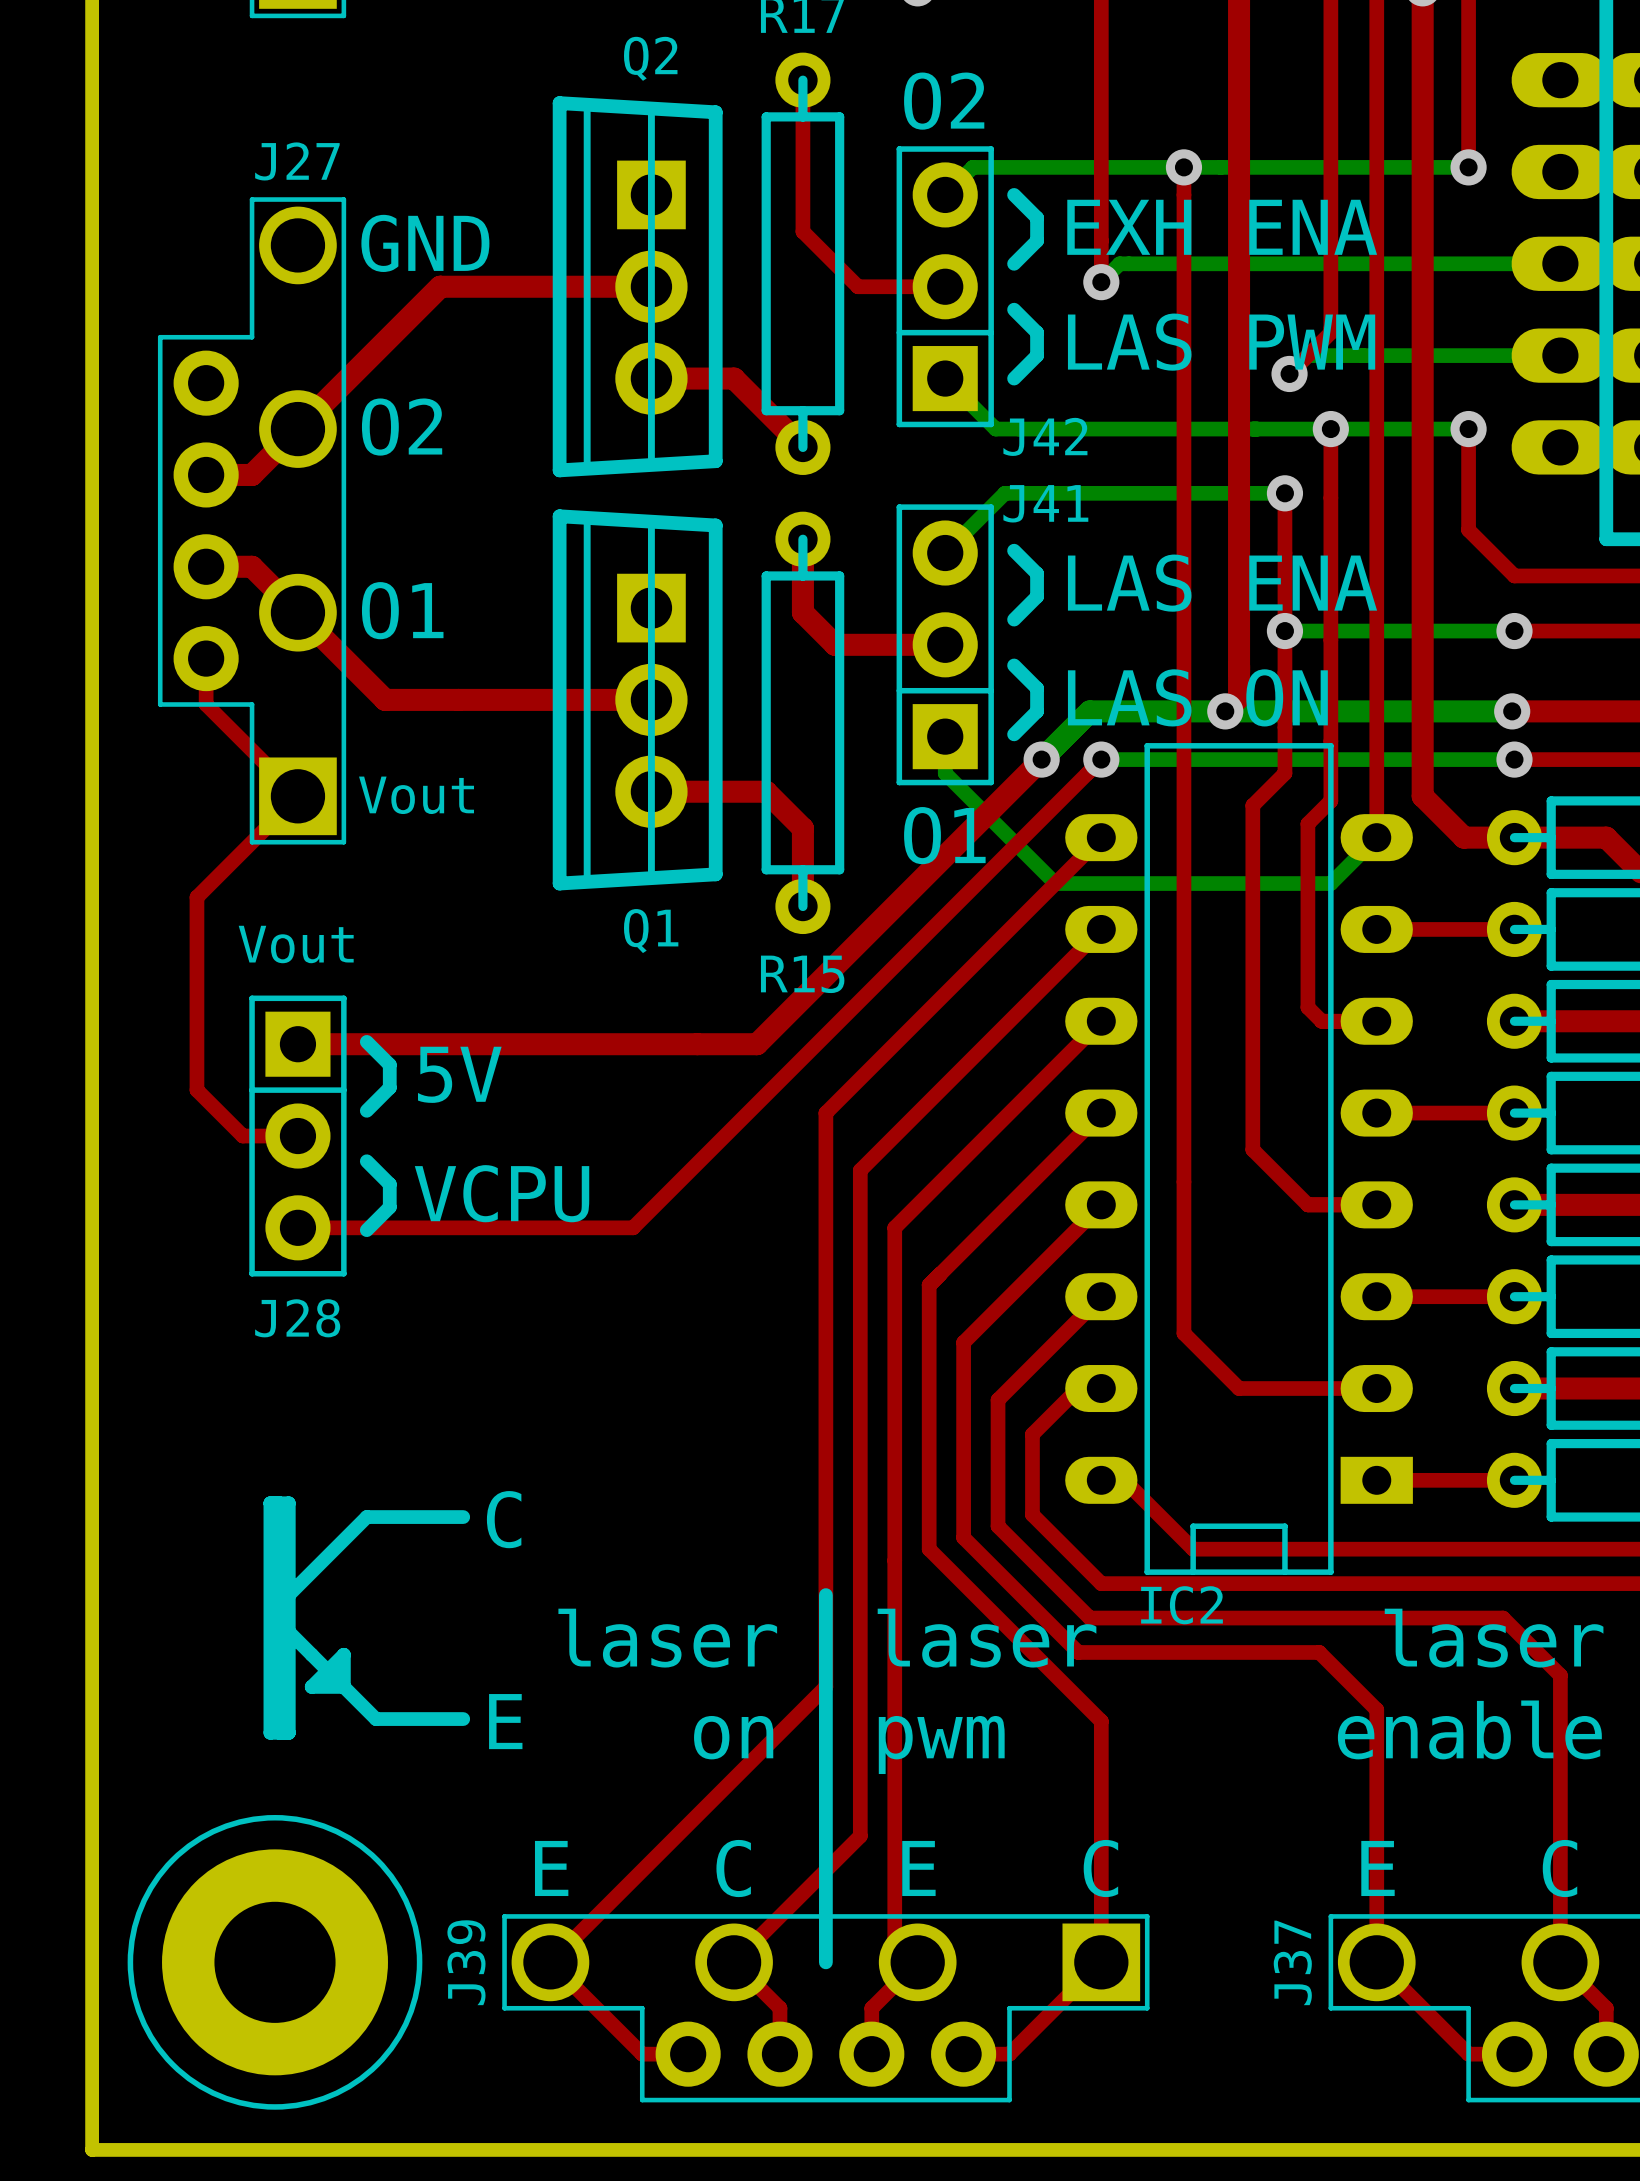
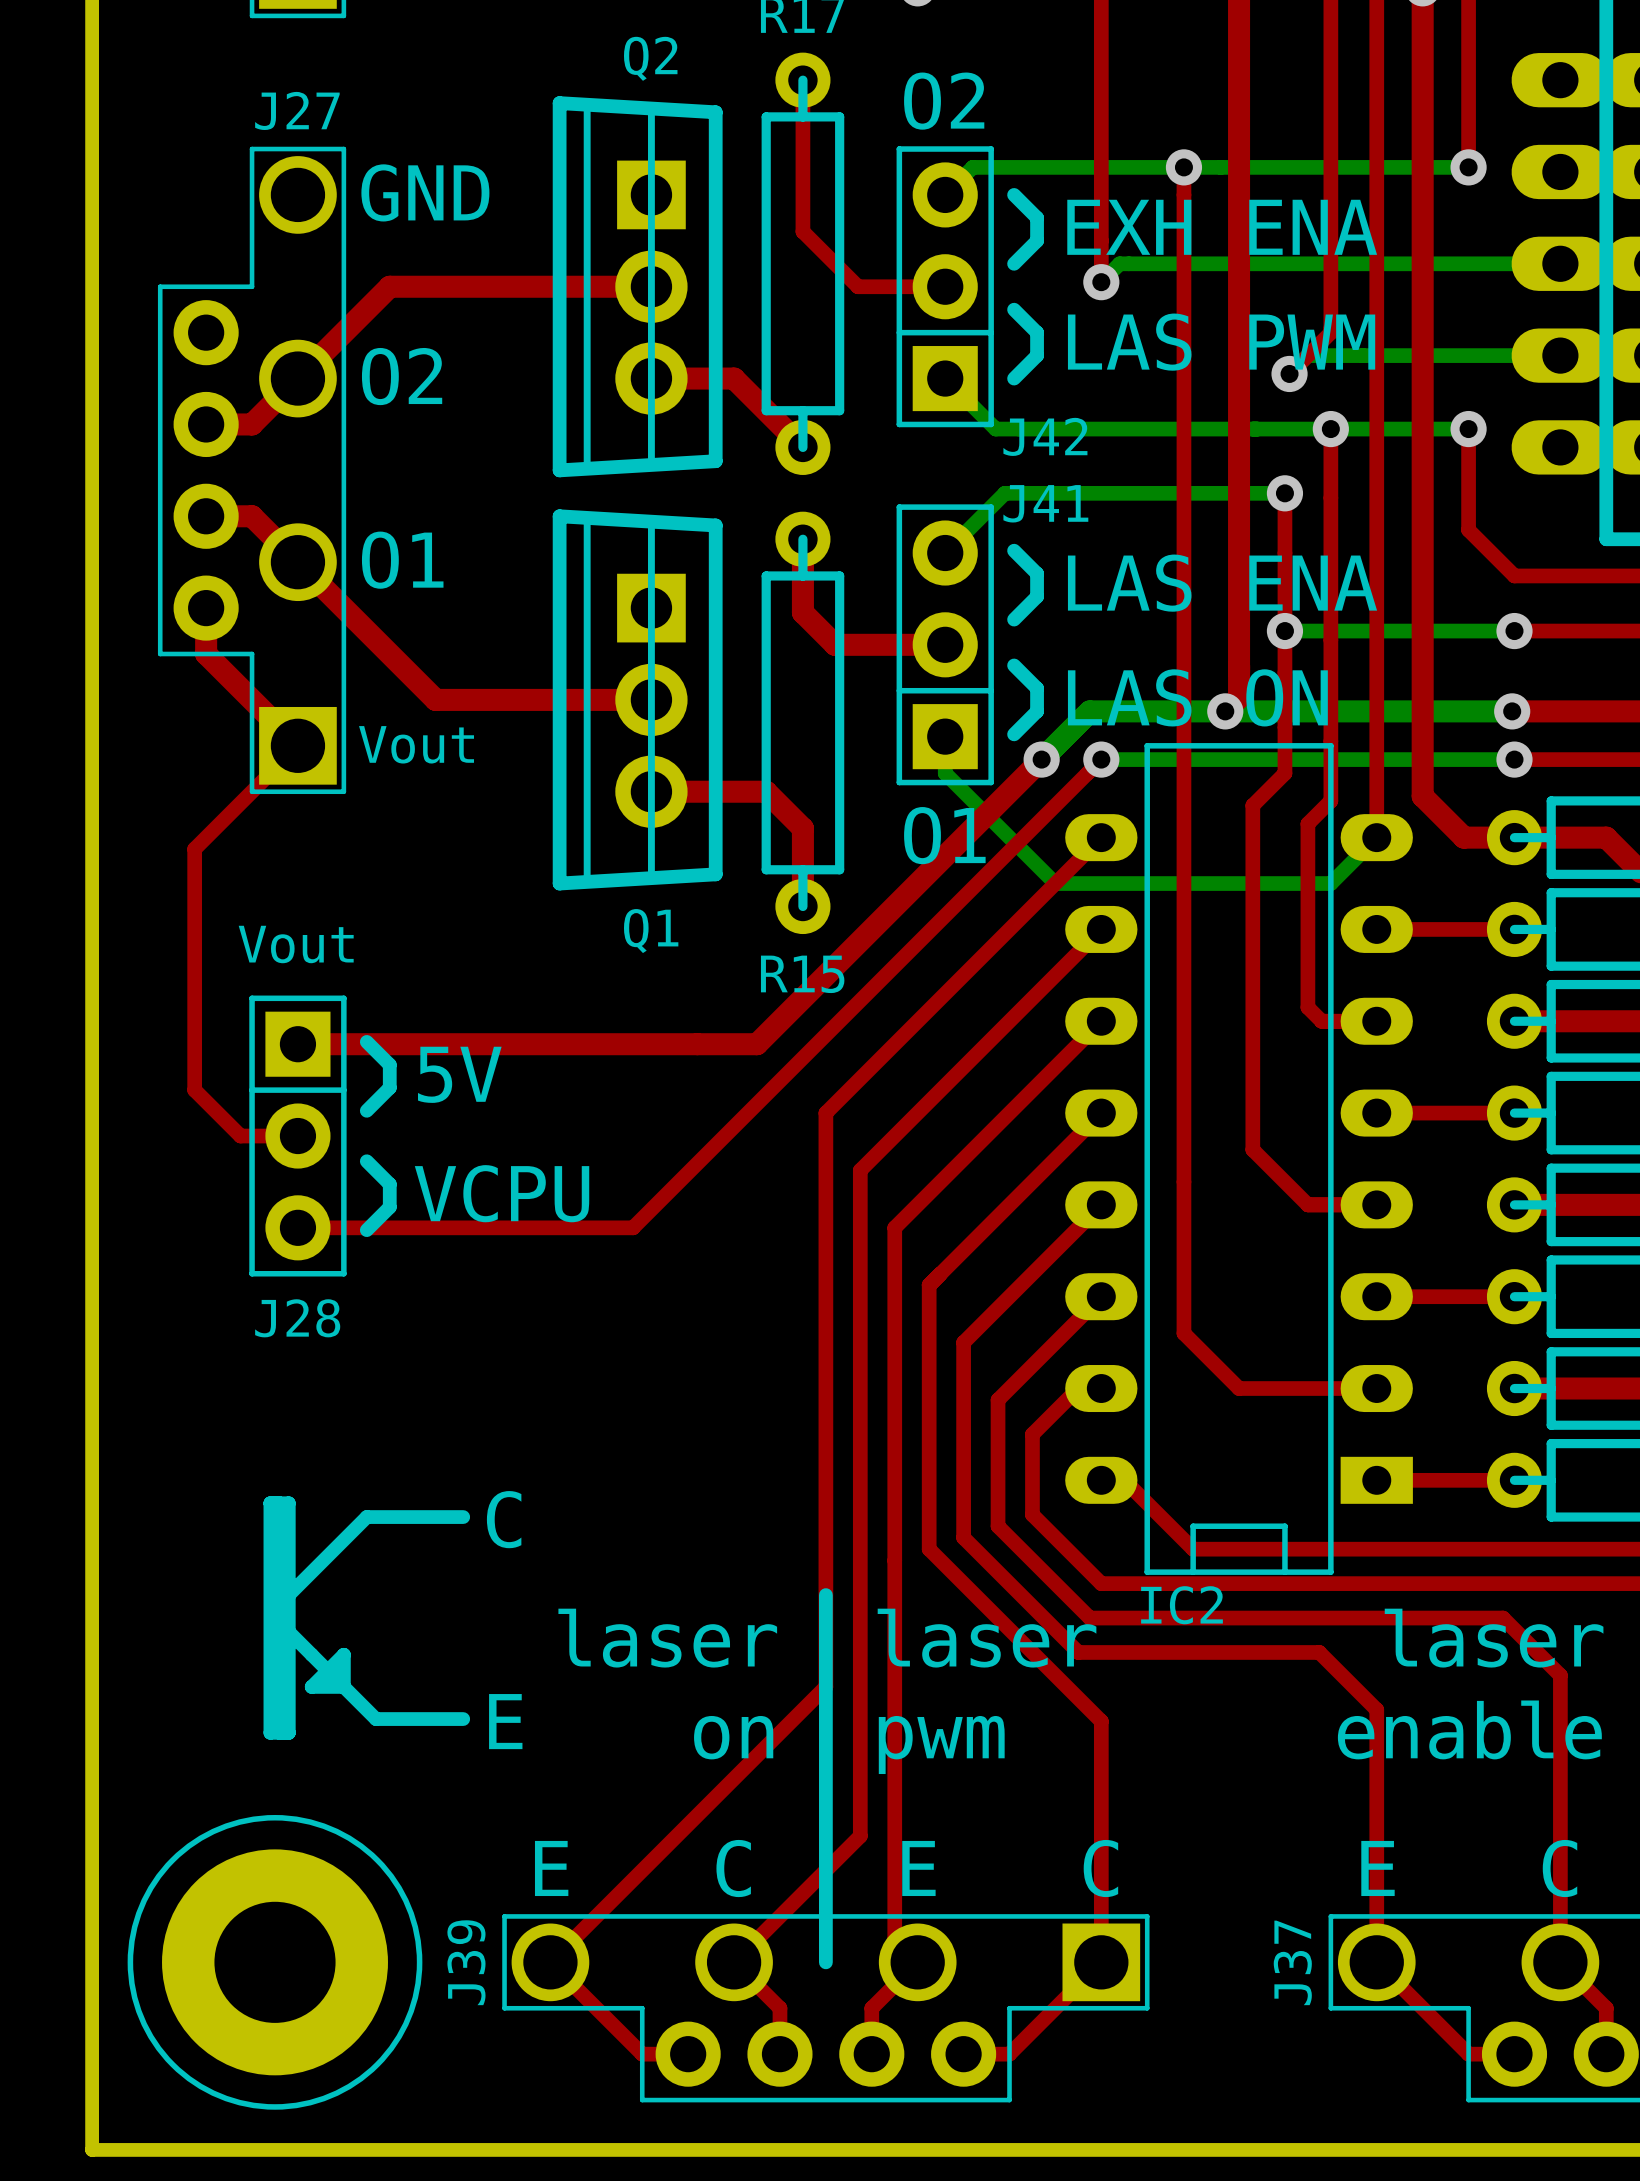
text position: GND (425, 243) -> GND (425, 192)
top track: (440, 286) (252, 474) (206, 474) -> (440, 286) (389, 286) (252, 424) (206, 424)
text position: O2 (402, 427) -> O2 (402, 376)
J27 position: (252, 520) -> (252, 470)
top track: (206, 566) (252, 566) (385, 699) (435, 699) -> (206, 516) (252, 516) (435, 699)
text position: O1 (402, 610) -> O1 (402, 560)
top track: (206, 658) (206, 704) (297, 796) (196, 897) (196, 1090) (242, 1136) -> (206, 608) (206, 654) (297, 745) (194, 849) (194, 1090) (240, 1136) (242, 1136)
text position: Vout (416, 795) -> Vout (416, 744)

